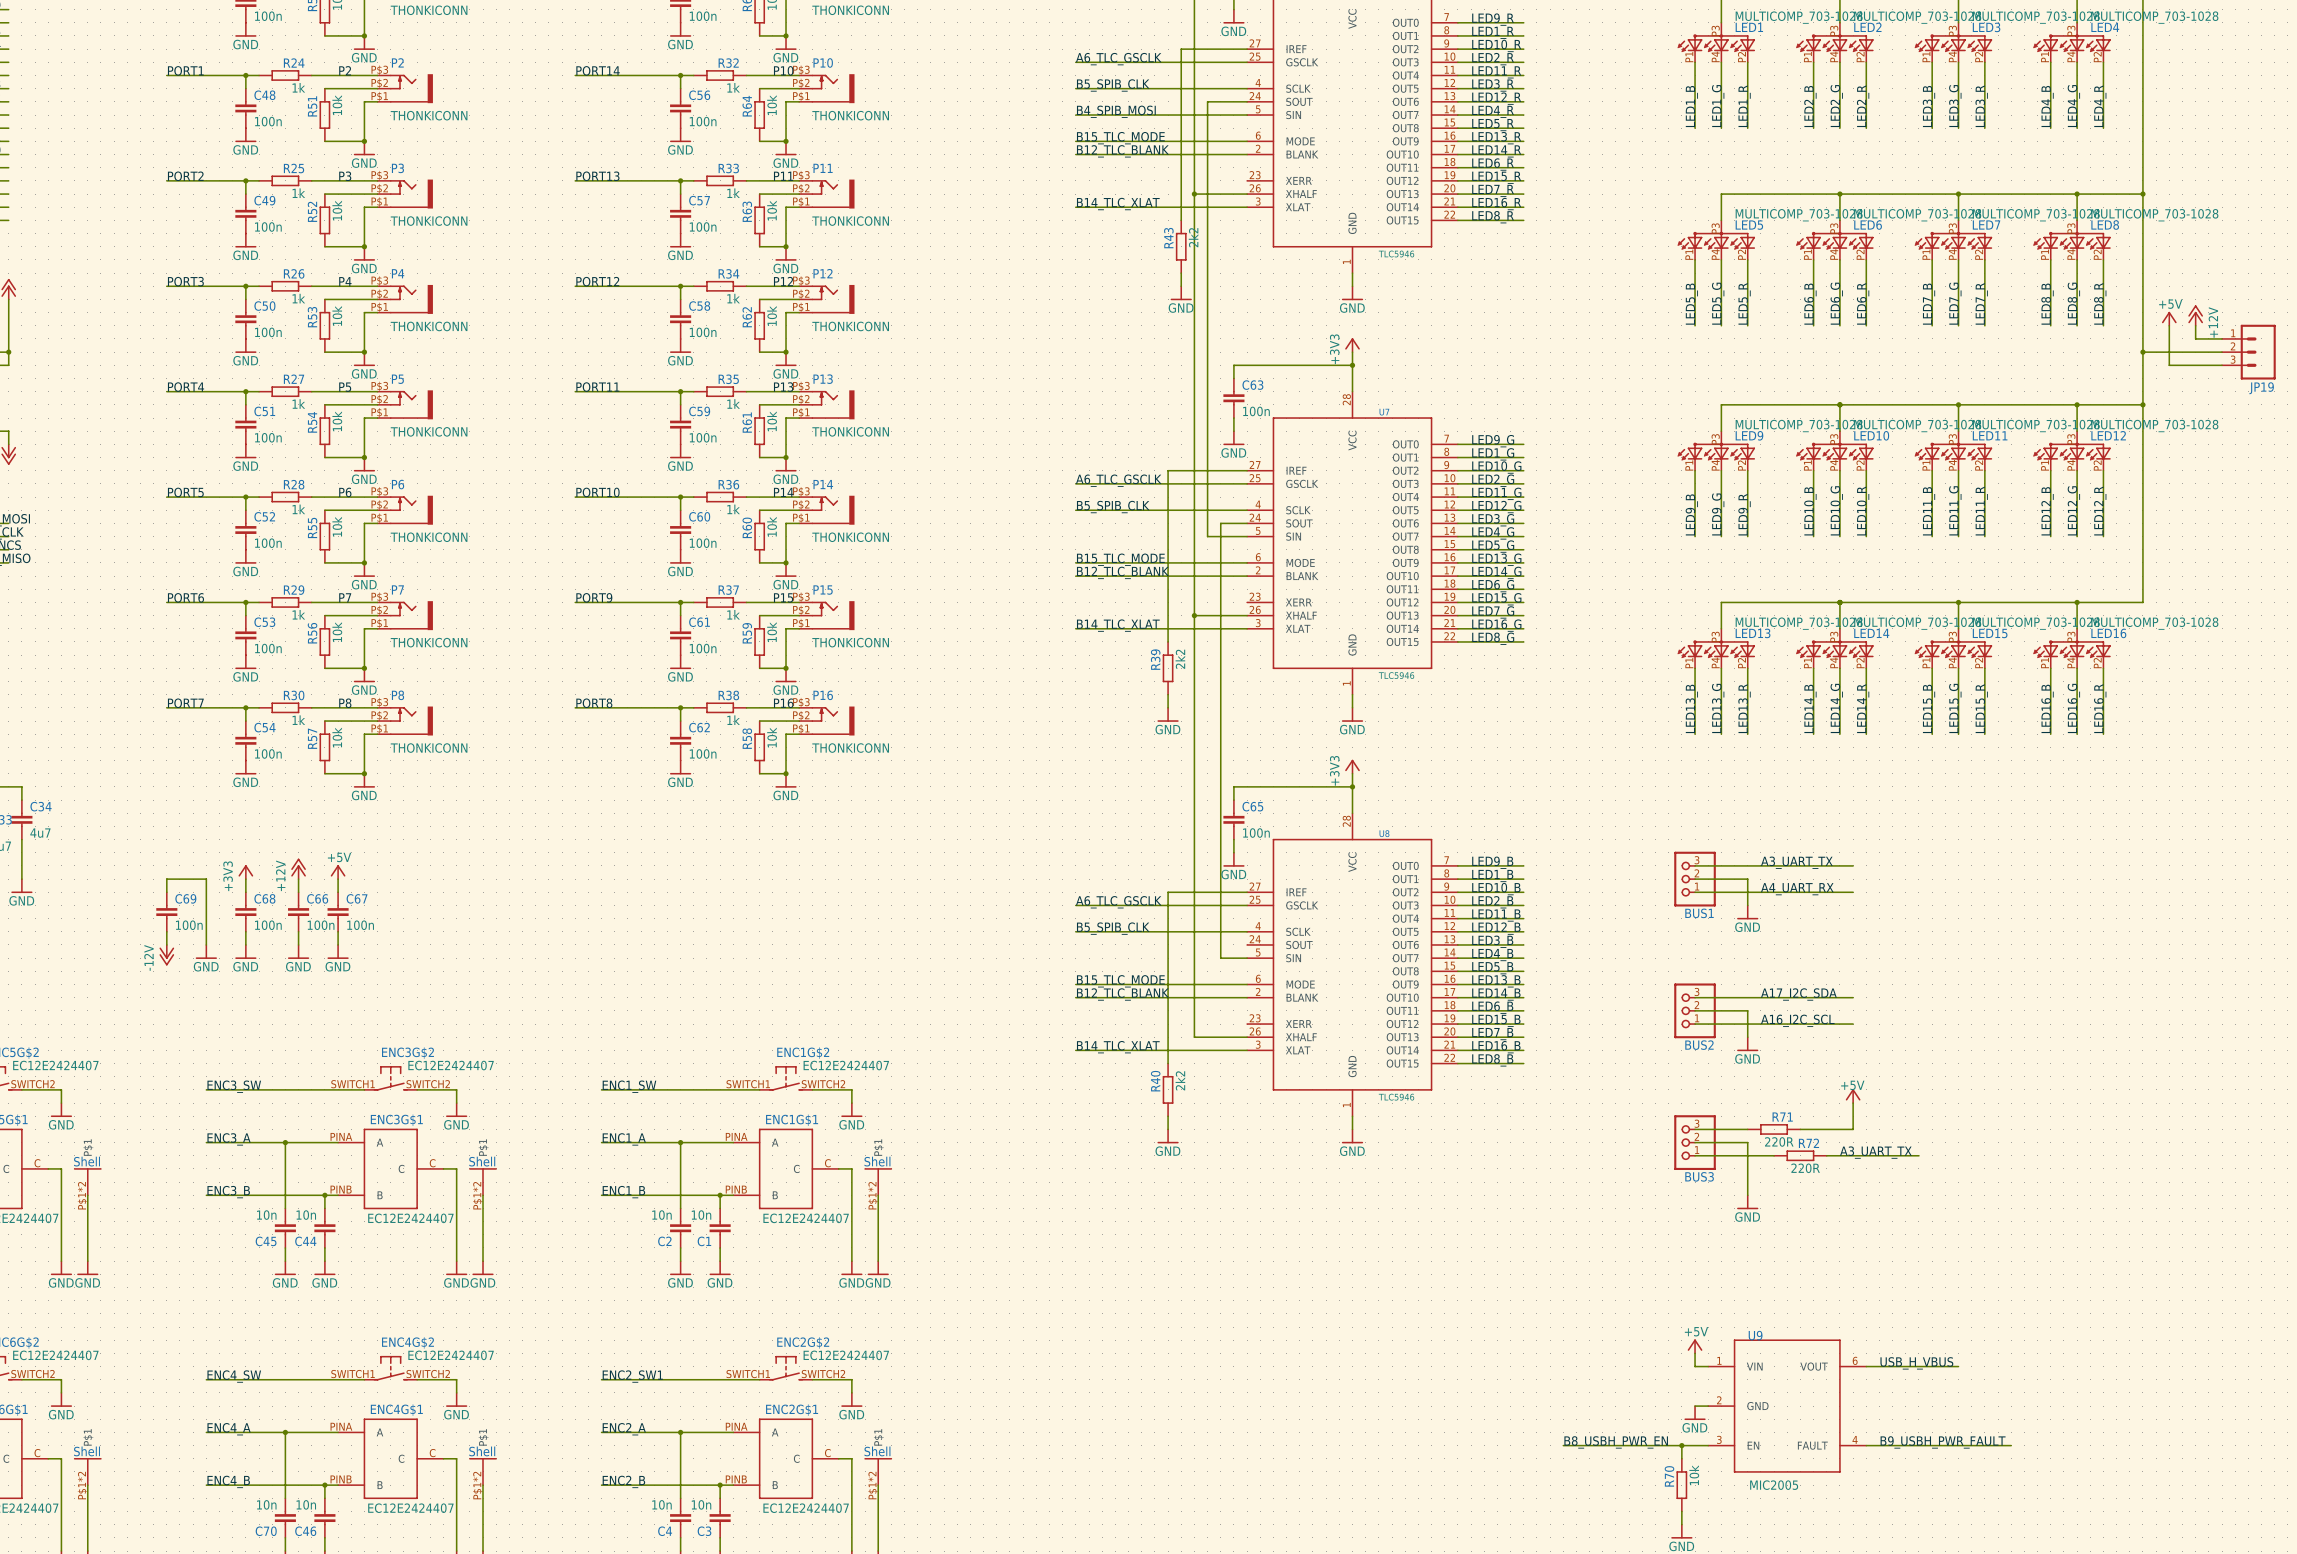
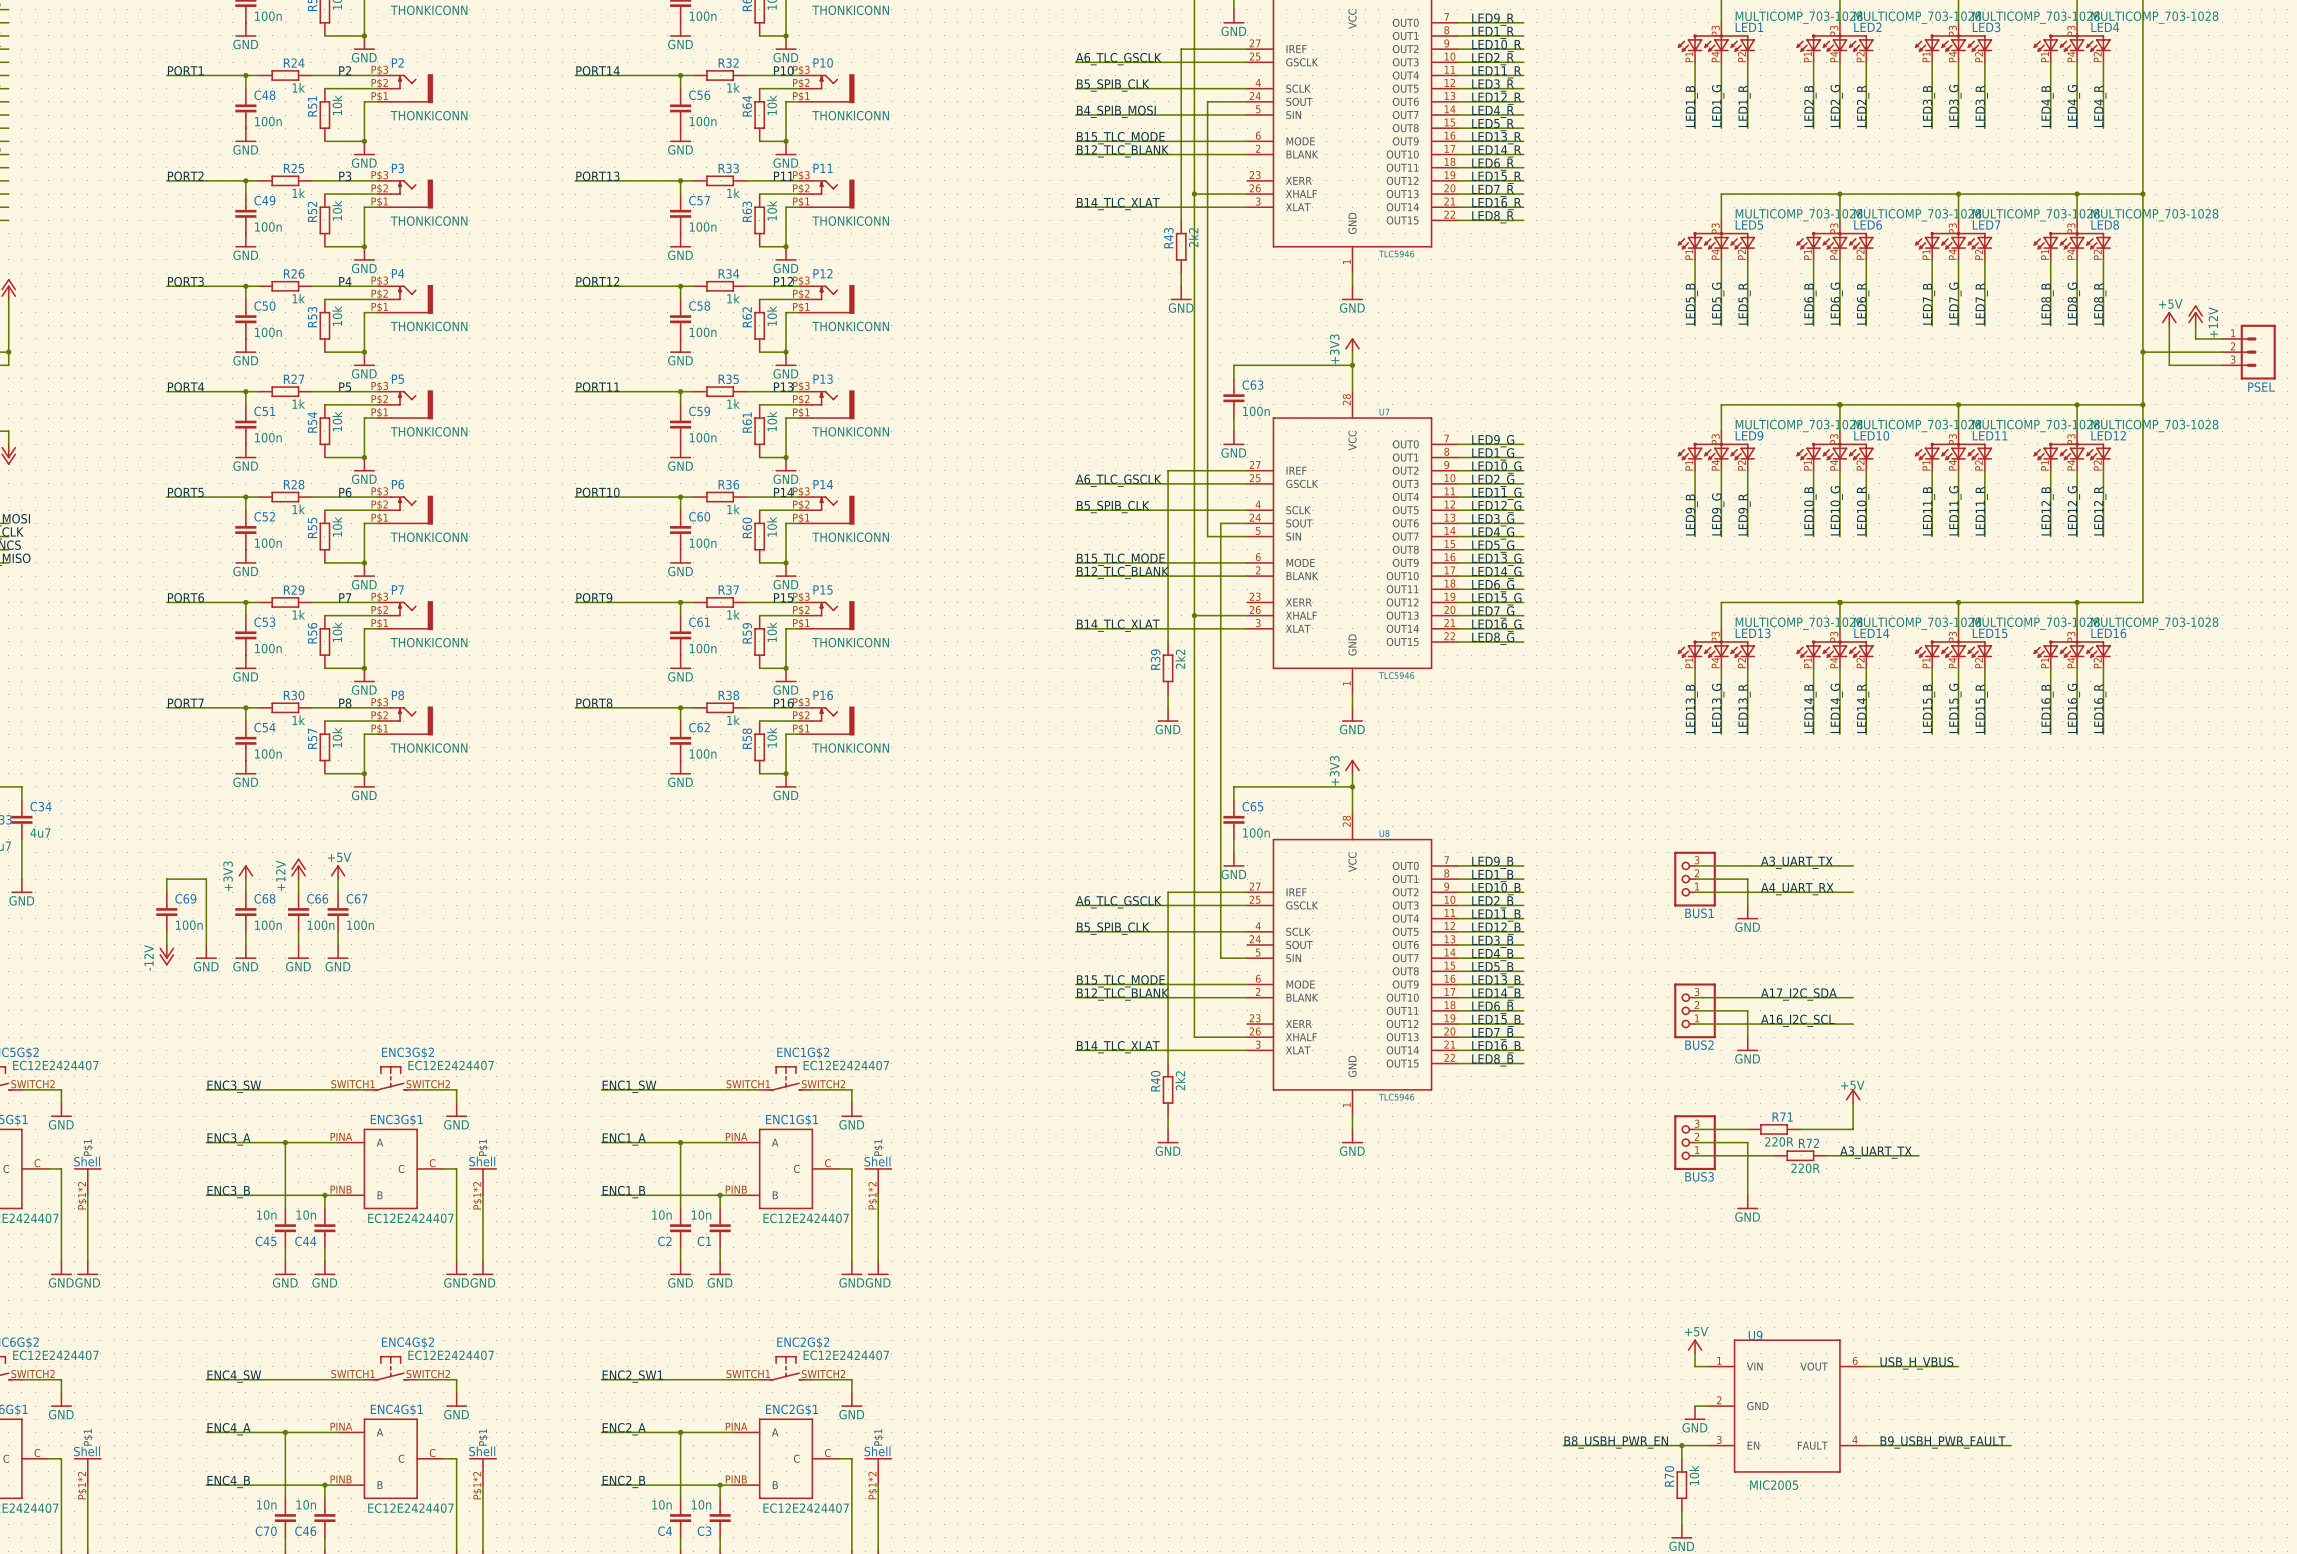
JP19 name: JP19 (2261, 388) -> PSEL (2261, 387)

